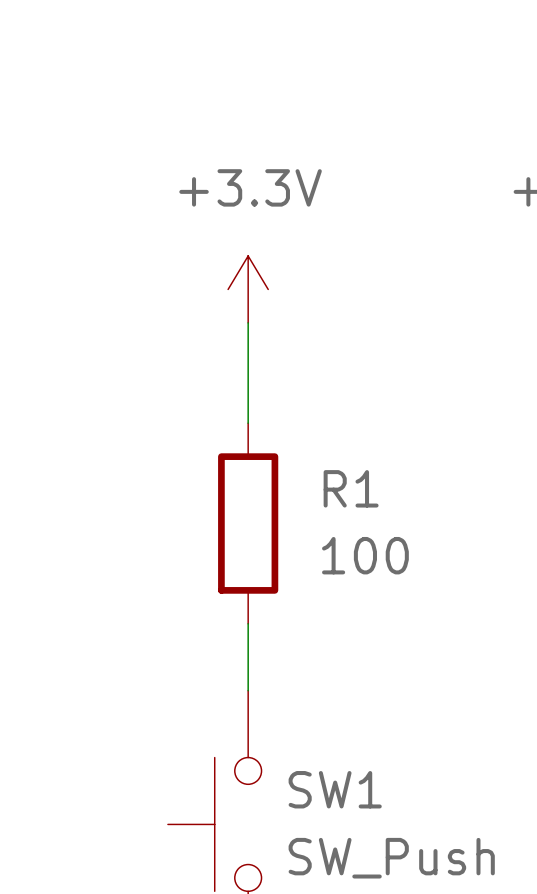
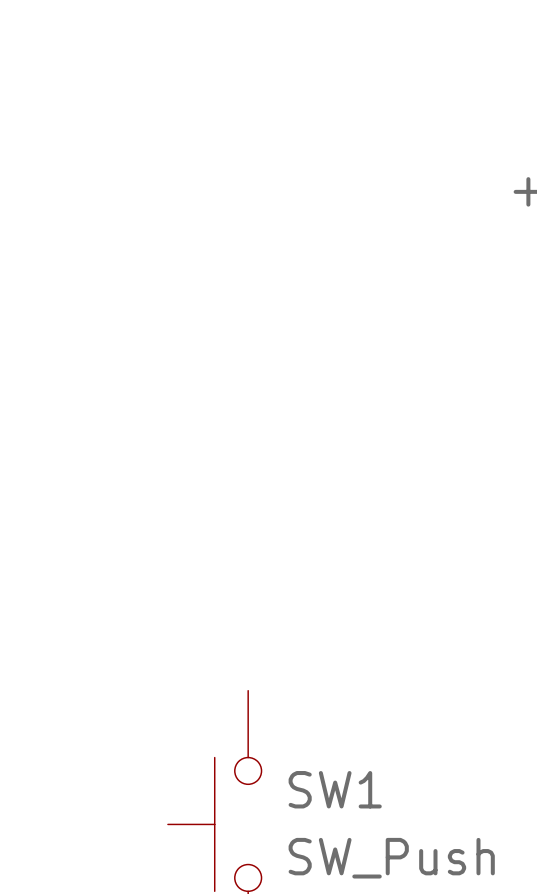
power symbol: +3.3V (248, 289) -> none
wire: (248, 322) (248, 423) -> none
R1: 100 (248, 523) -> none
wire: (248, 623) (248, 690) -> none

